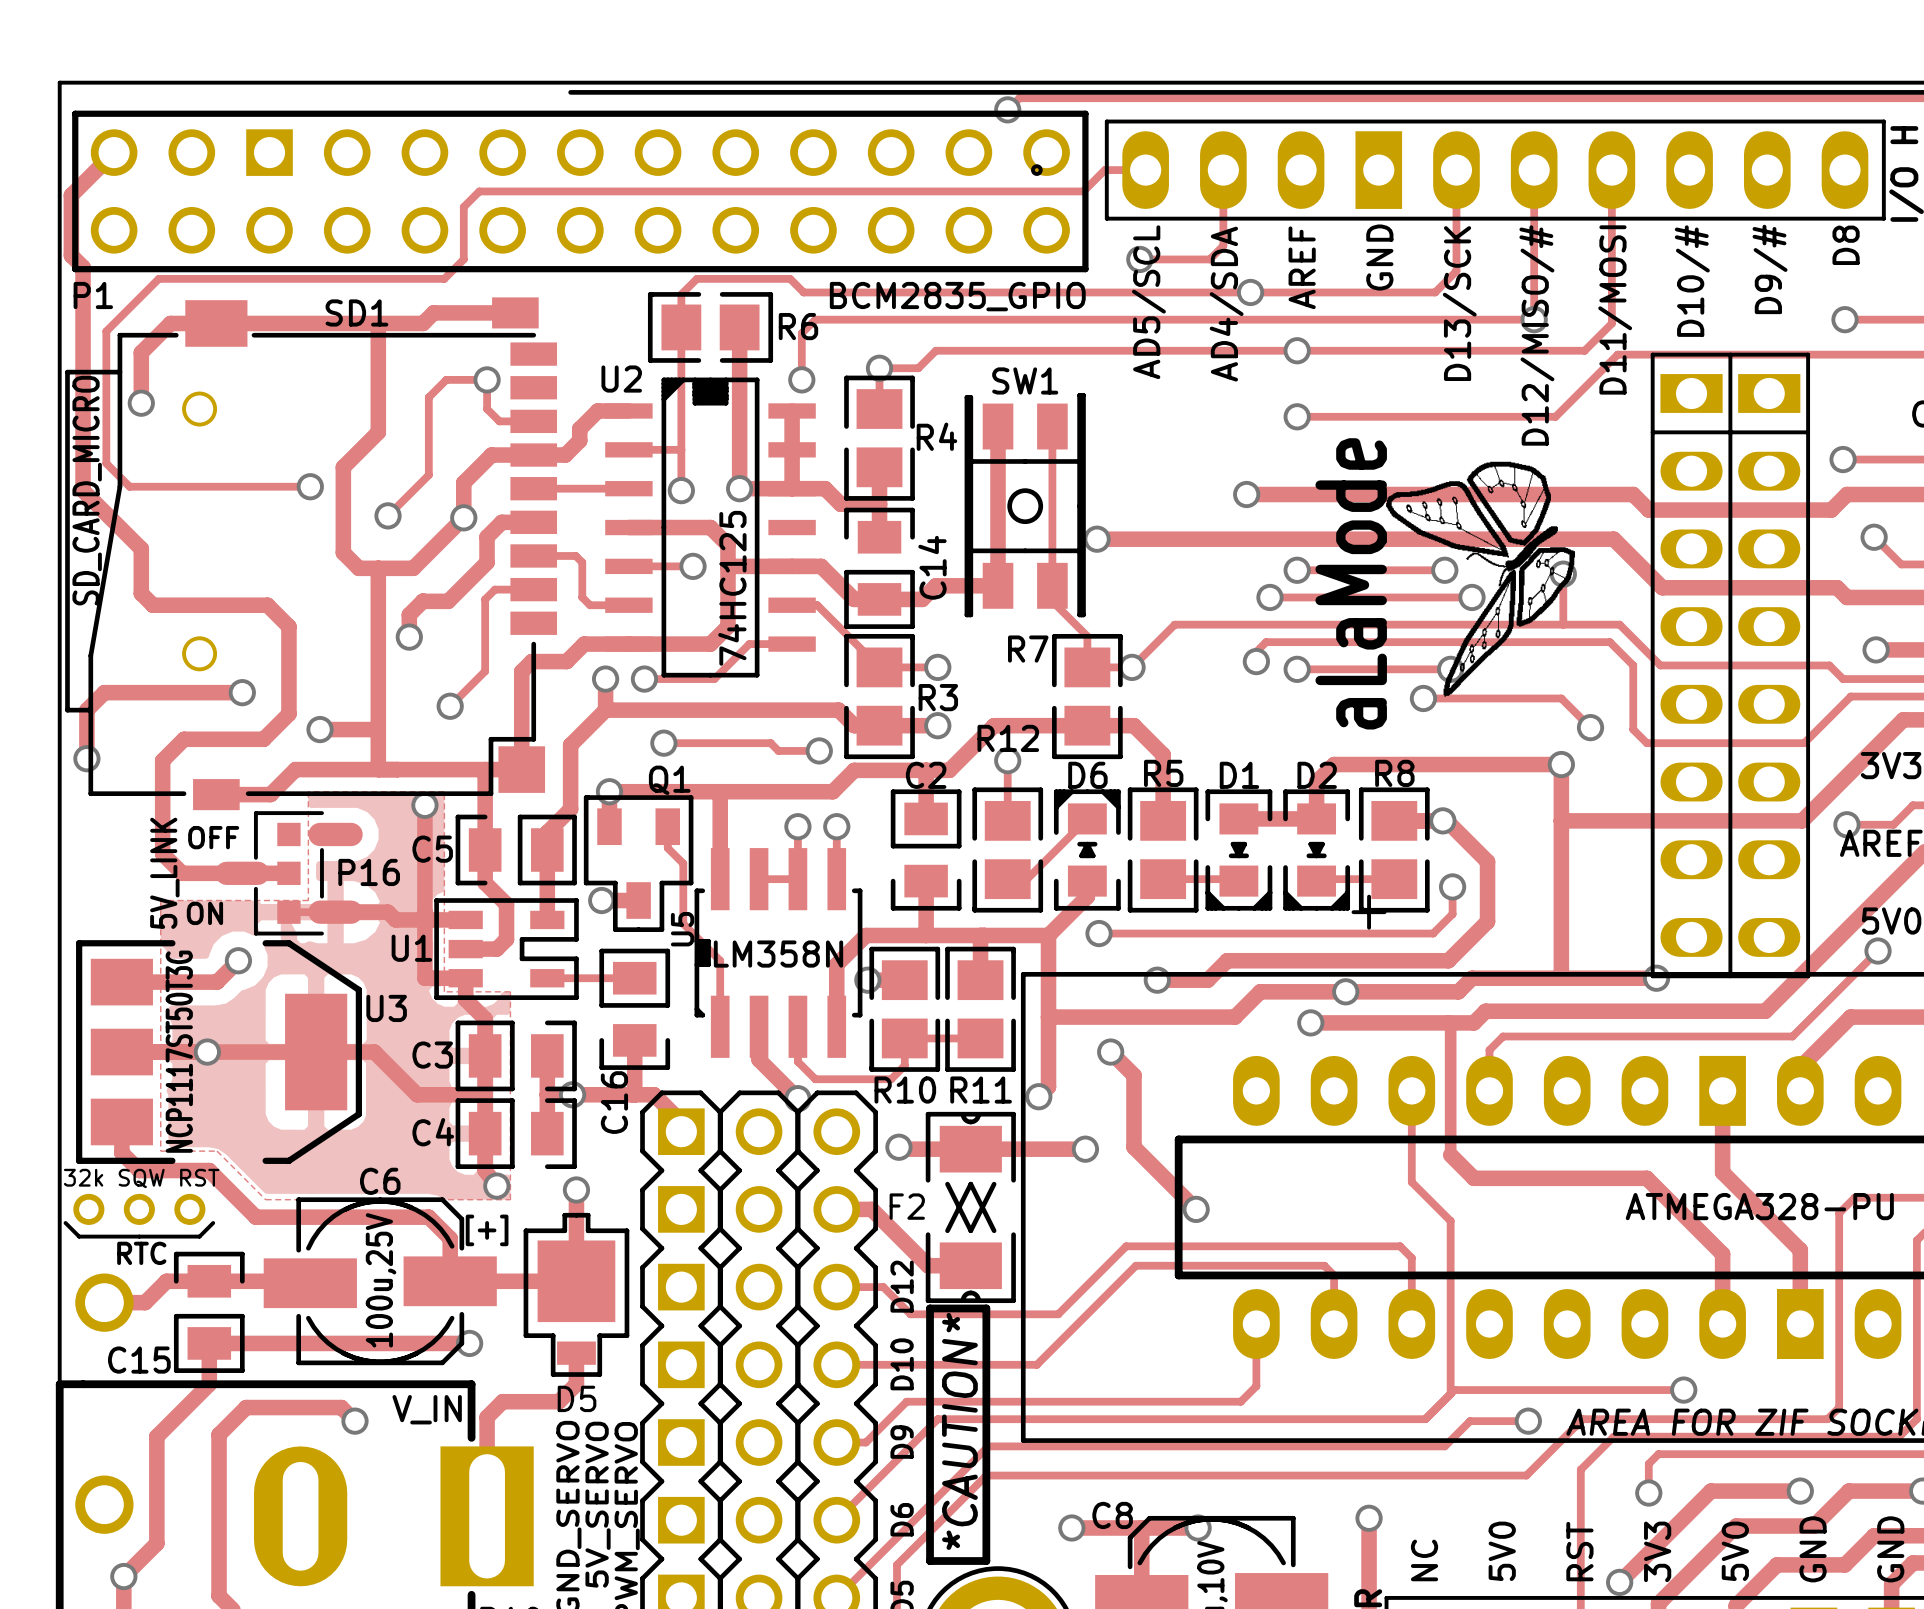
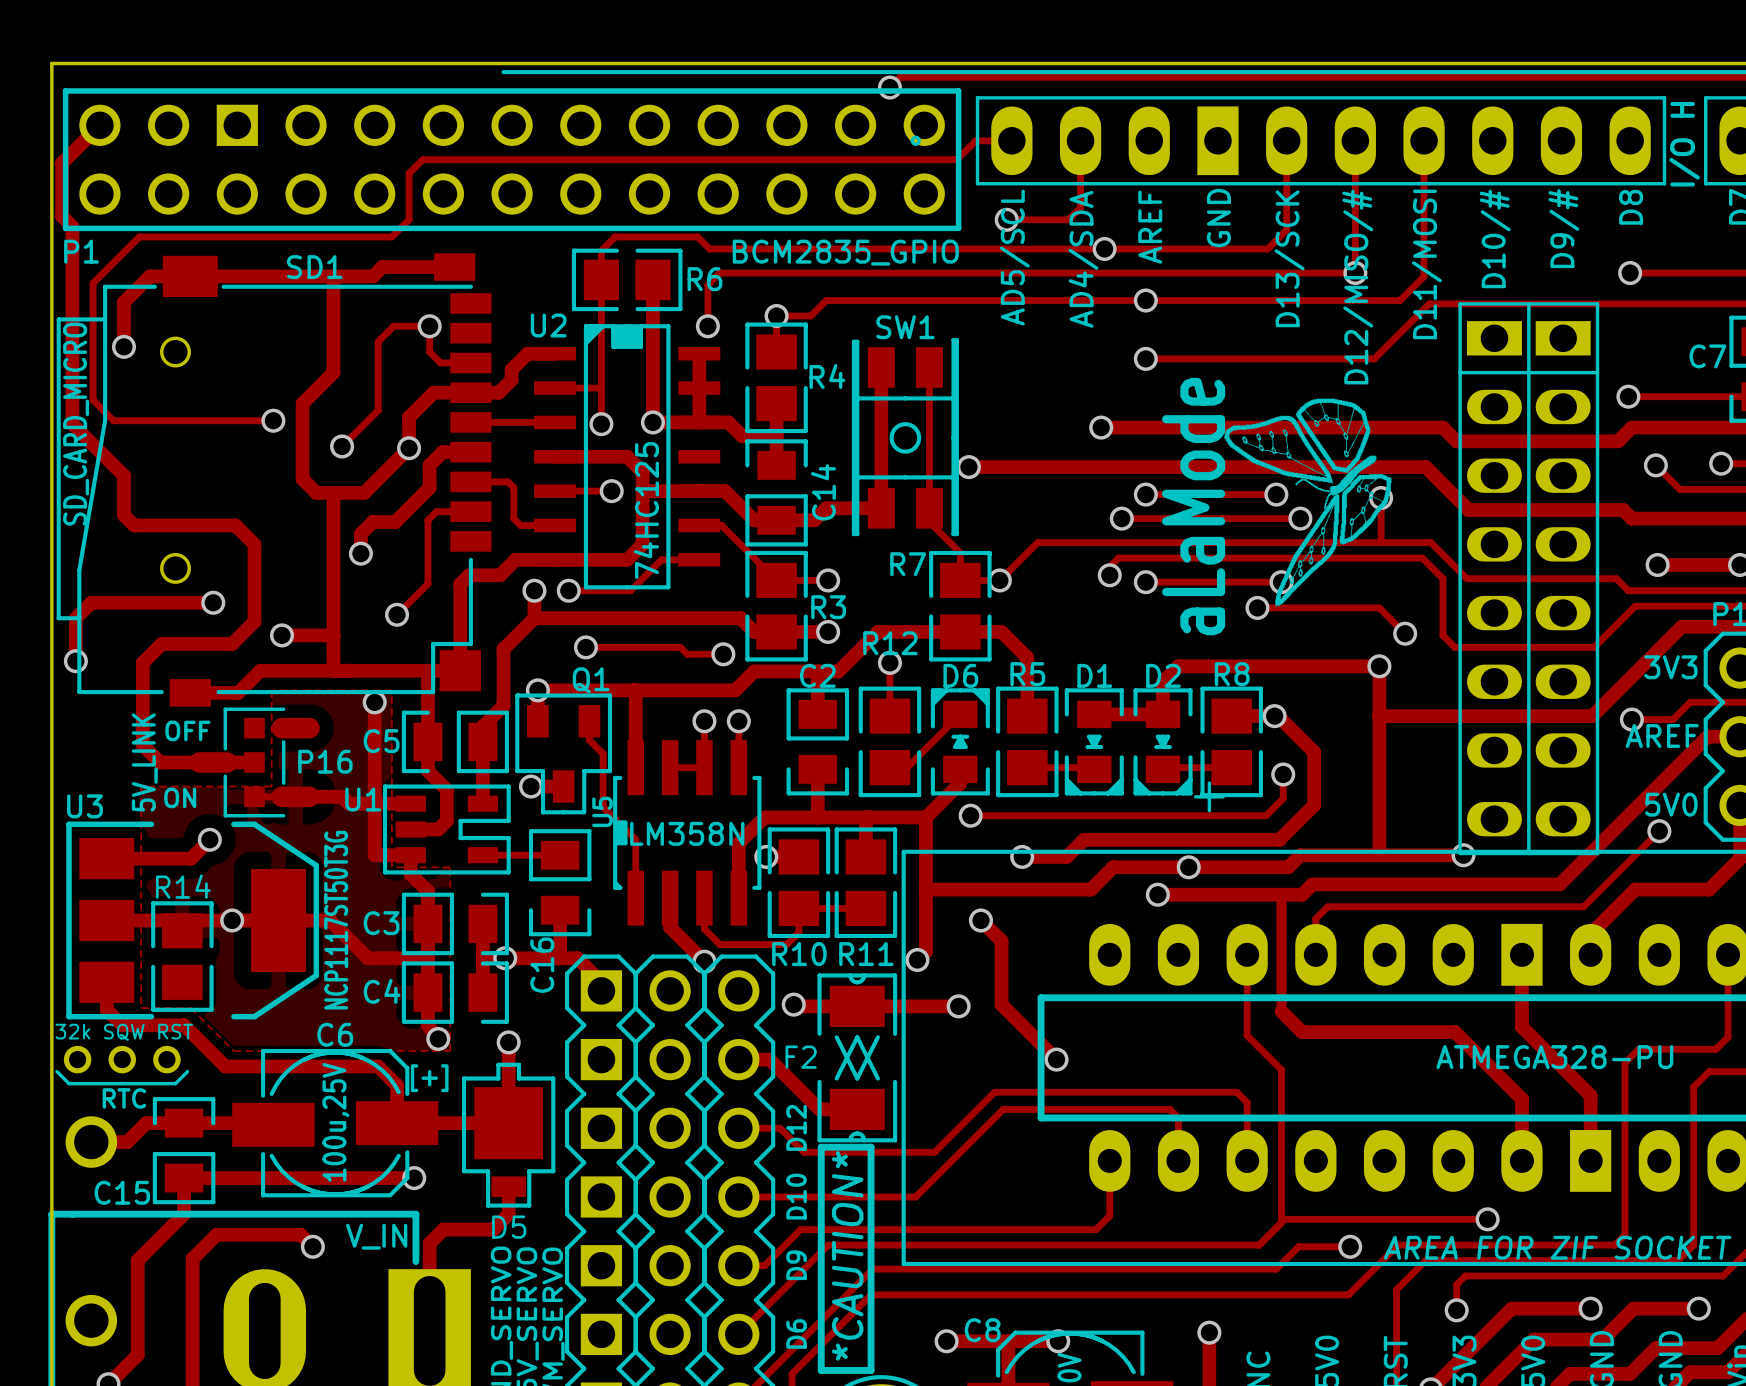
U1 name position: U1 (411, 948) -> U1 (363, 799)
U3 name position: U3 (386, 1008) -> U3 (84, 806)
U3 value position: NCP1117ST50T3G (179, 1051) -> NCP1117ST50T3G (336, 920)
via position: (207, 1052) -> (232, 920)
R14: none -> (182, 956)

